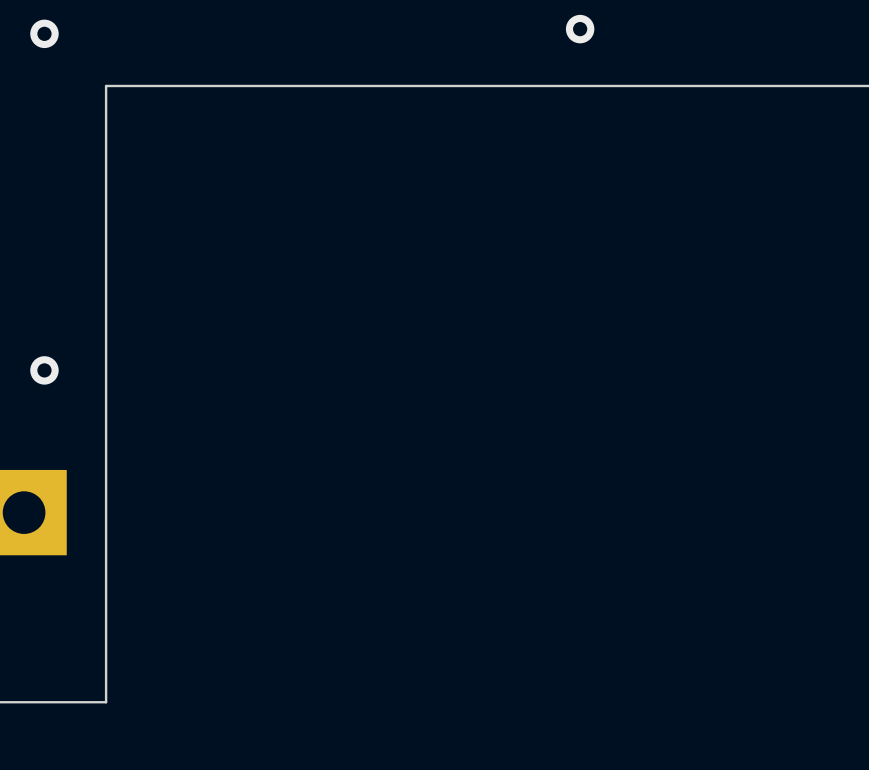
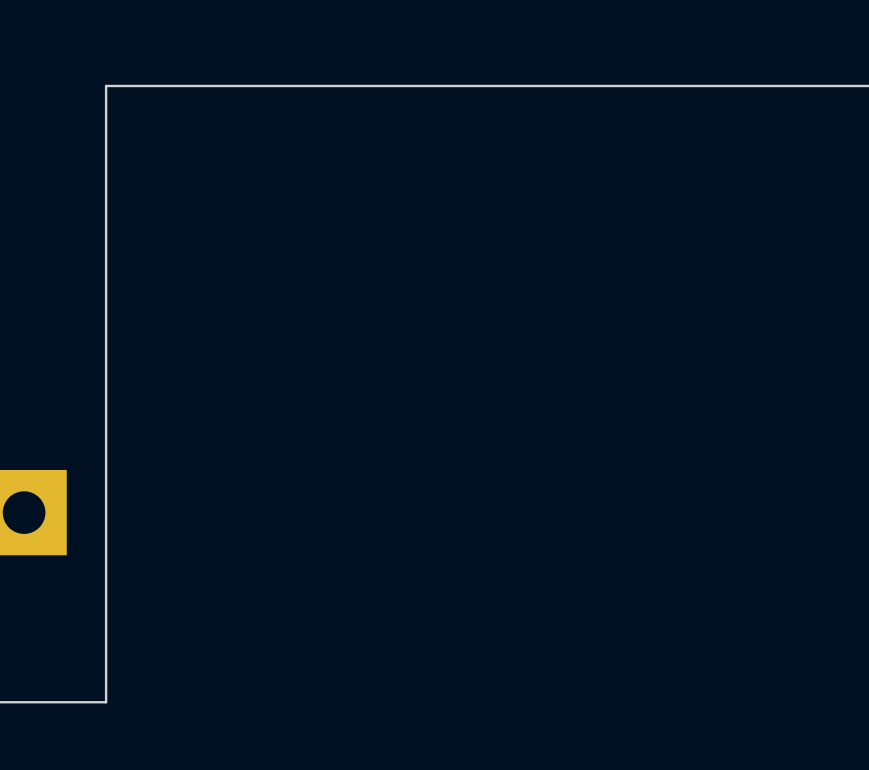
via: (580, 29) -> none
via: (44, 33) -> none
via: (44, 370) -> none

